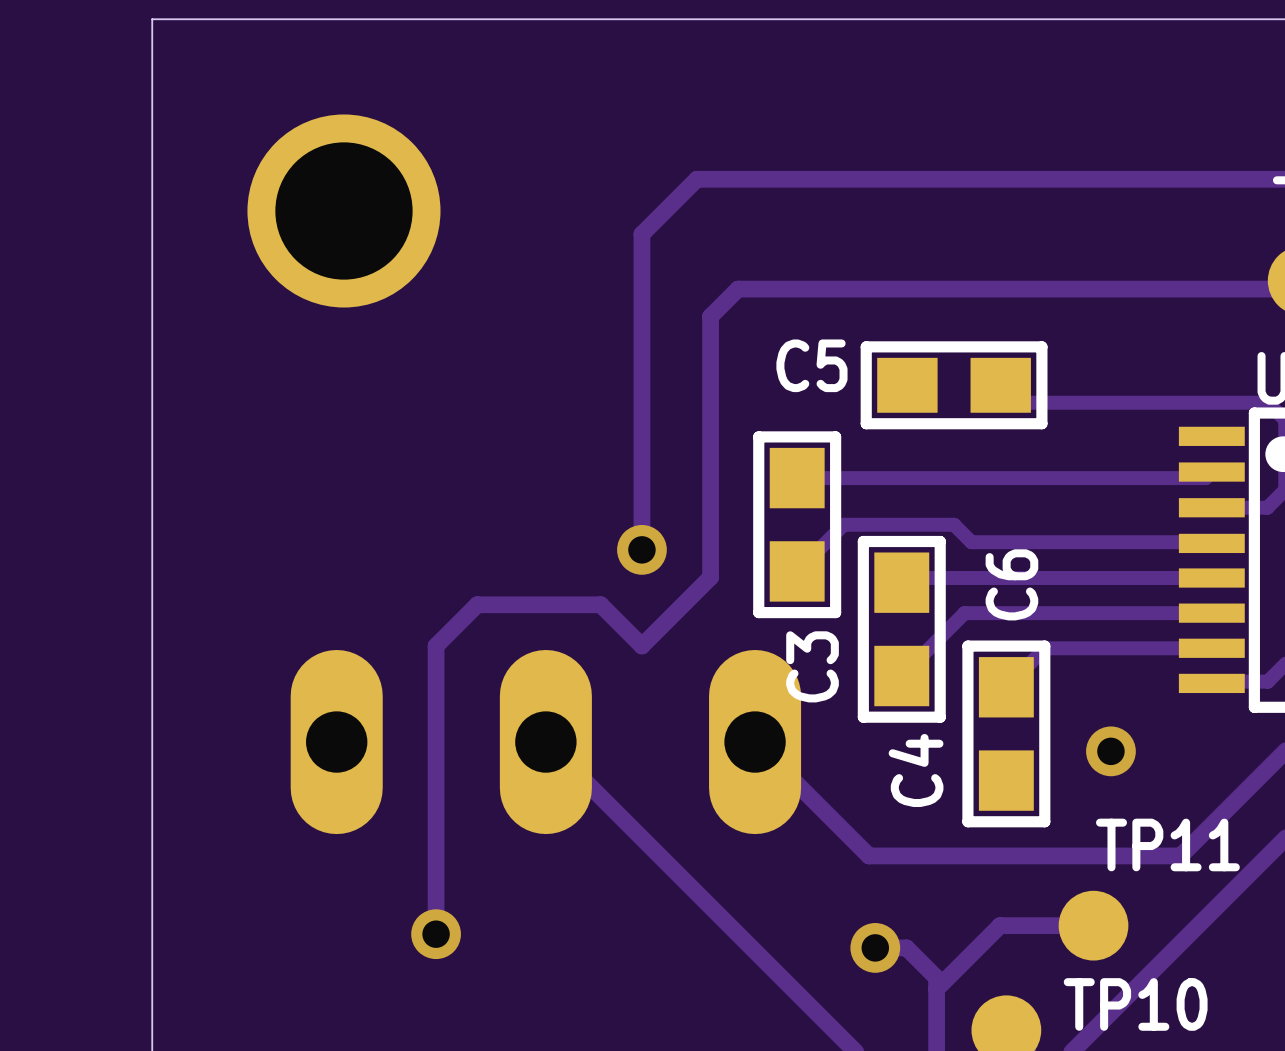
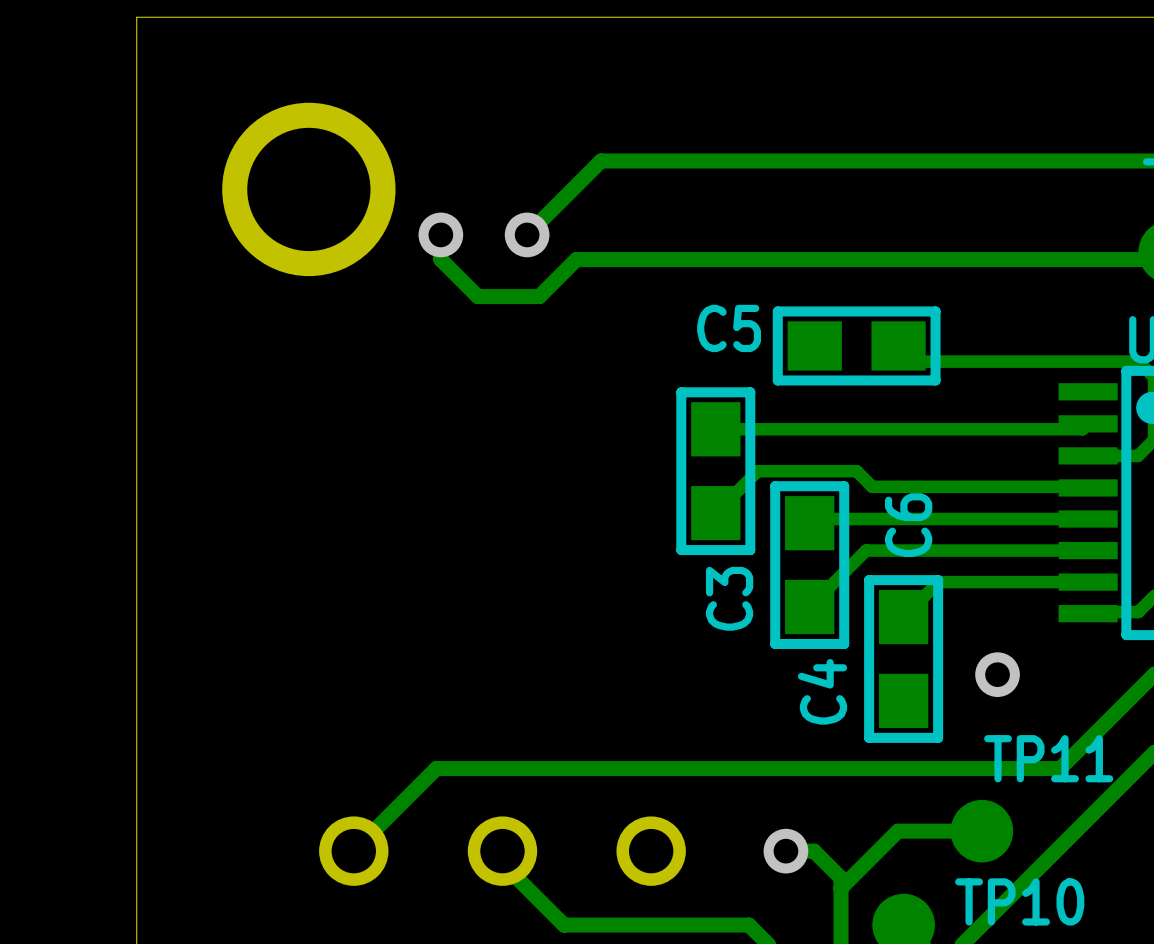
track: (696, 179) (641, 234) (641, 549) -> (625, 160) (601, 160) (527, 234)
via: none -> (440, 234)
via: none -> (527, 234)
track: (738, 289) (710, 316) (710, 577) (641, 645) (600, 604) (477, 604) (436, 645) (436, 934) -> (662, 259) (576, 259) (539, 296) (477, 296) (440, 259) (440, 234)
via: (641, 549) -> none
track: (545, 742) (834, 1030) -> (502, 851) (502, 863) (564, 925) (748, 925)
part: (545, 742) -> none
track: (755, 742) (868, 855) -> (353, 851) (436, 768) (780, 768)
via: (436, 934) -> none
part: none -> (502, 851)

